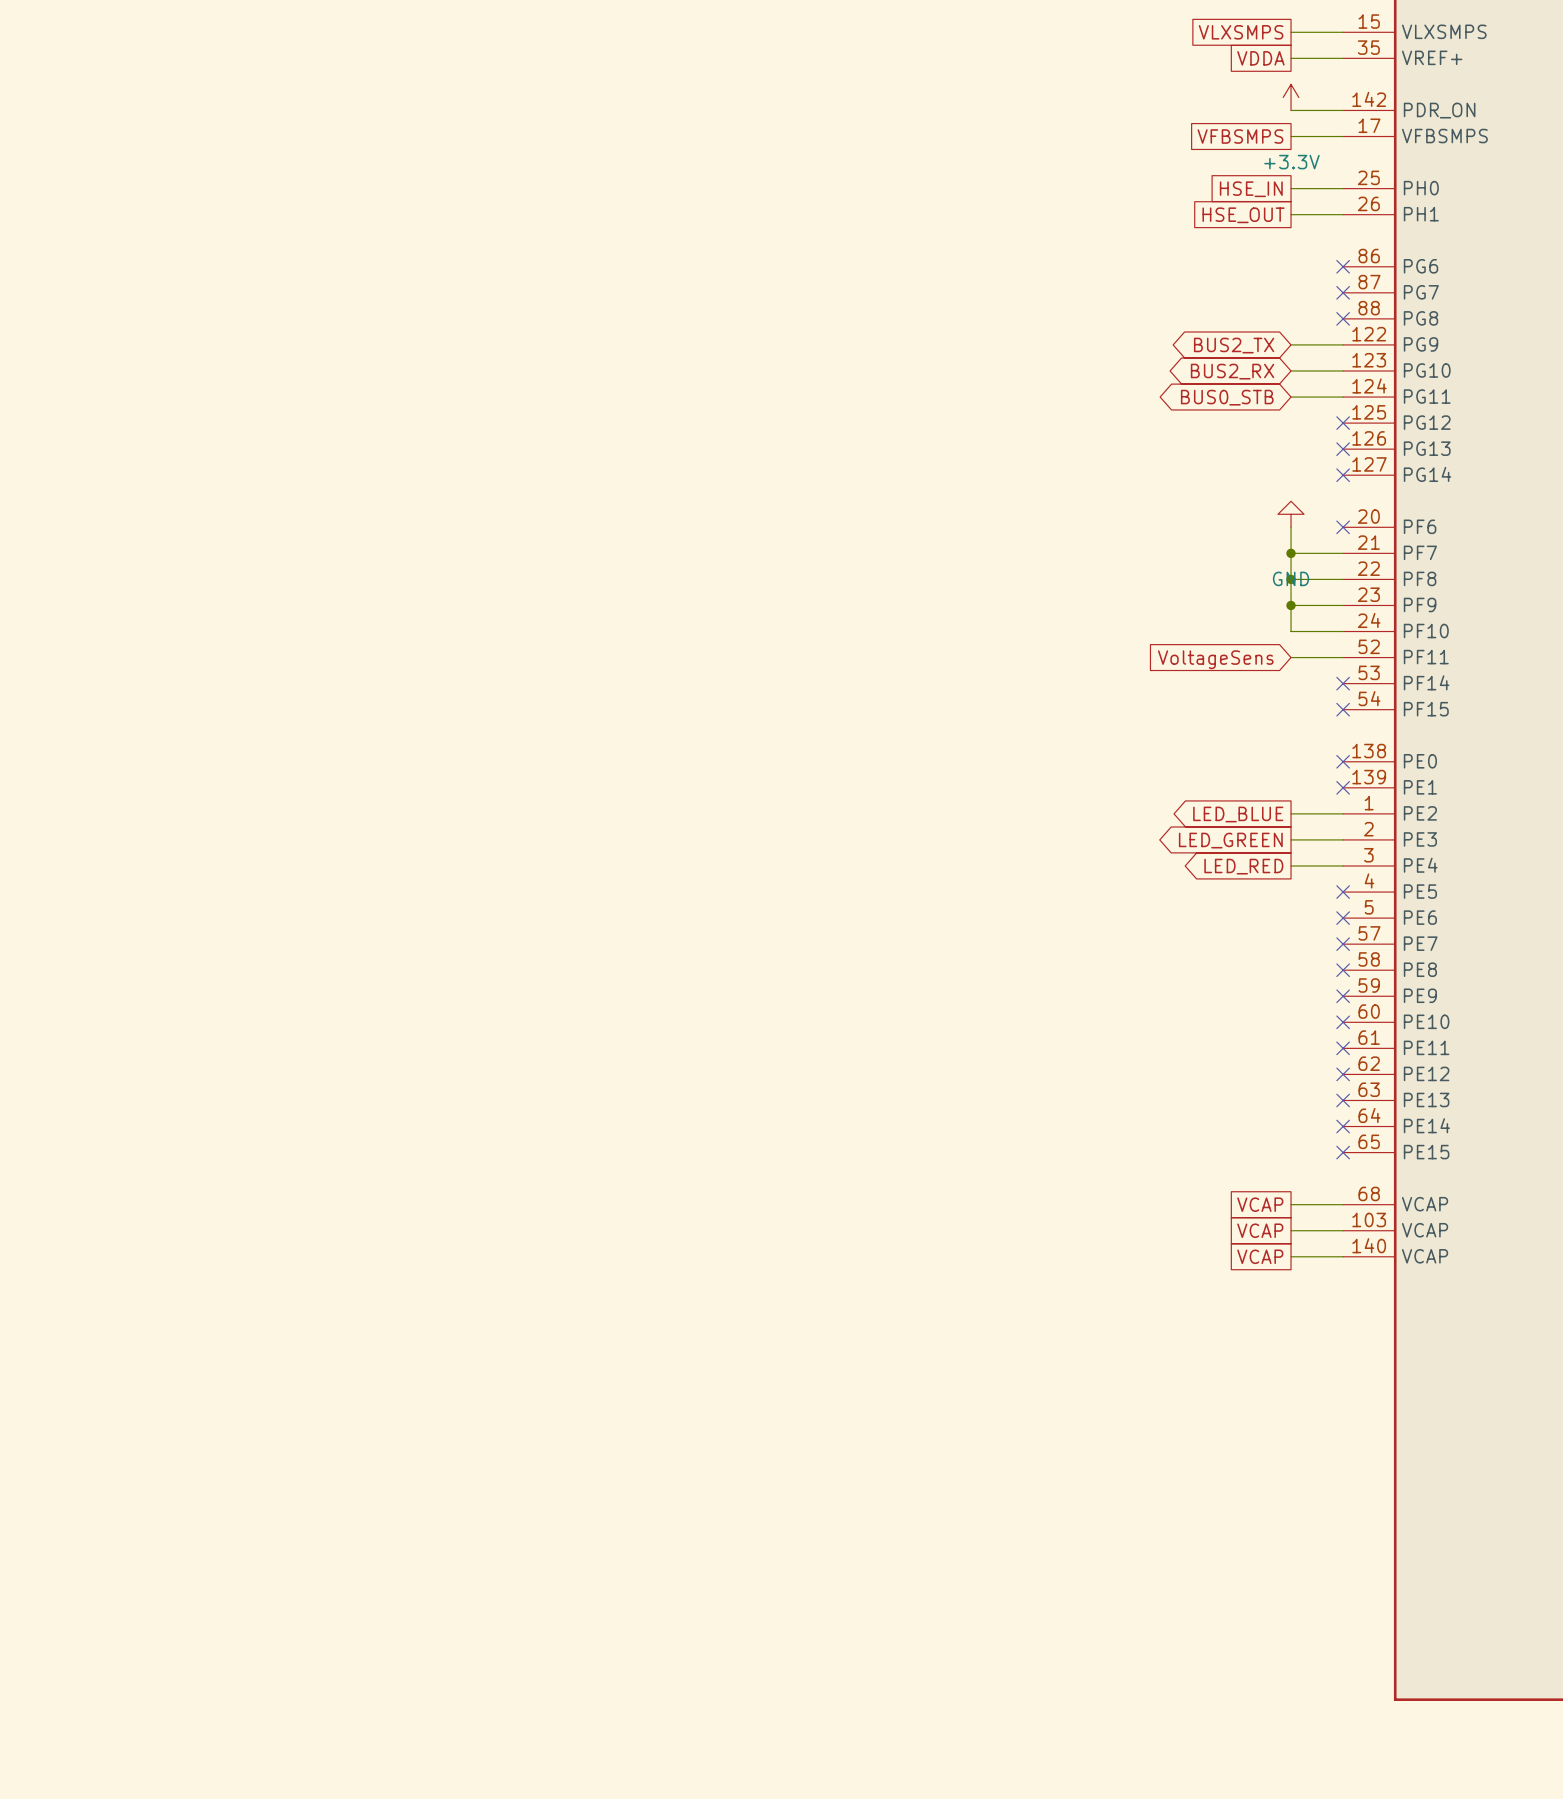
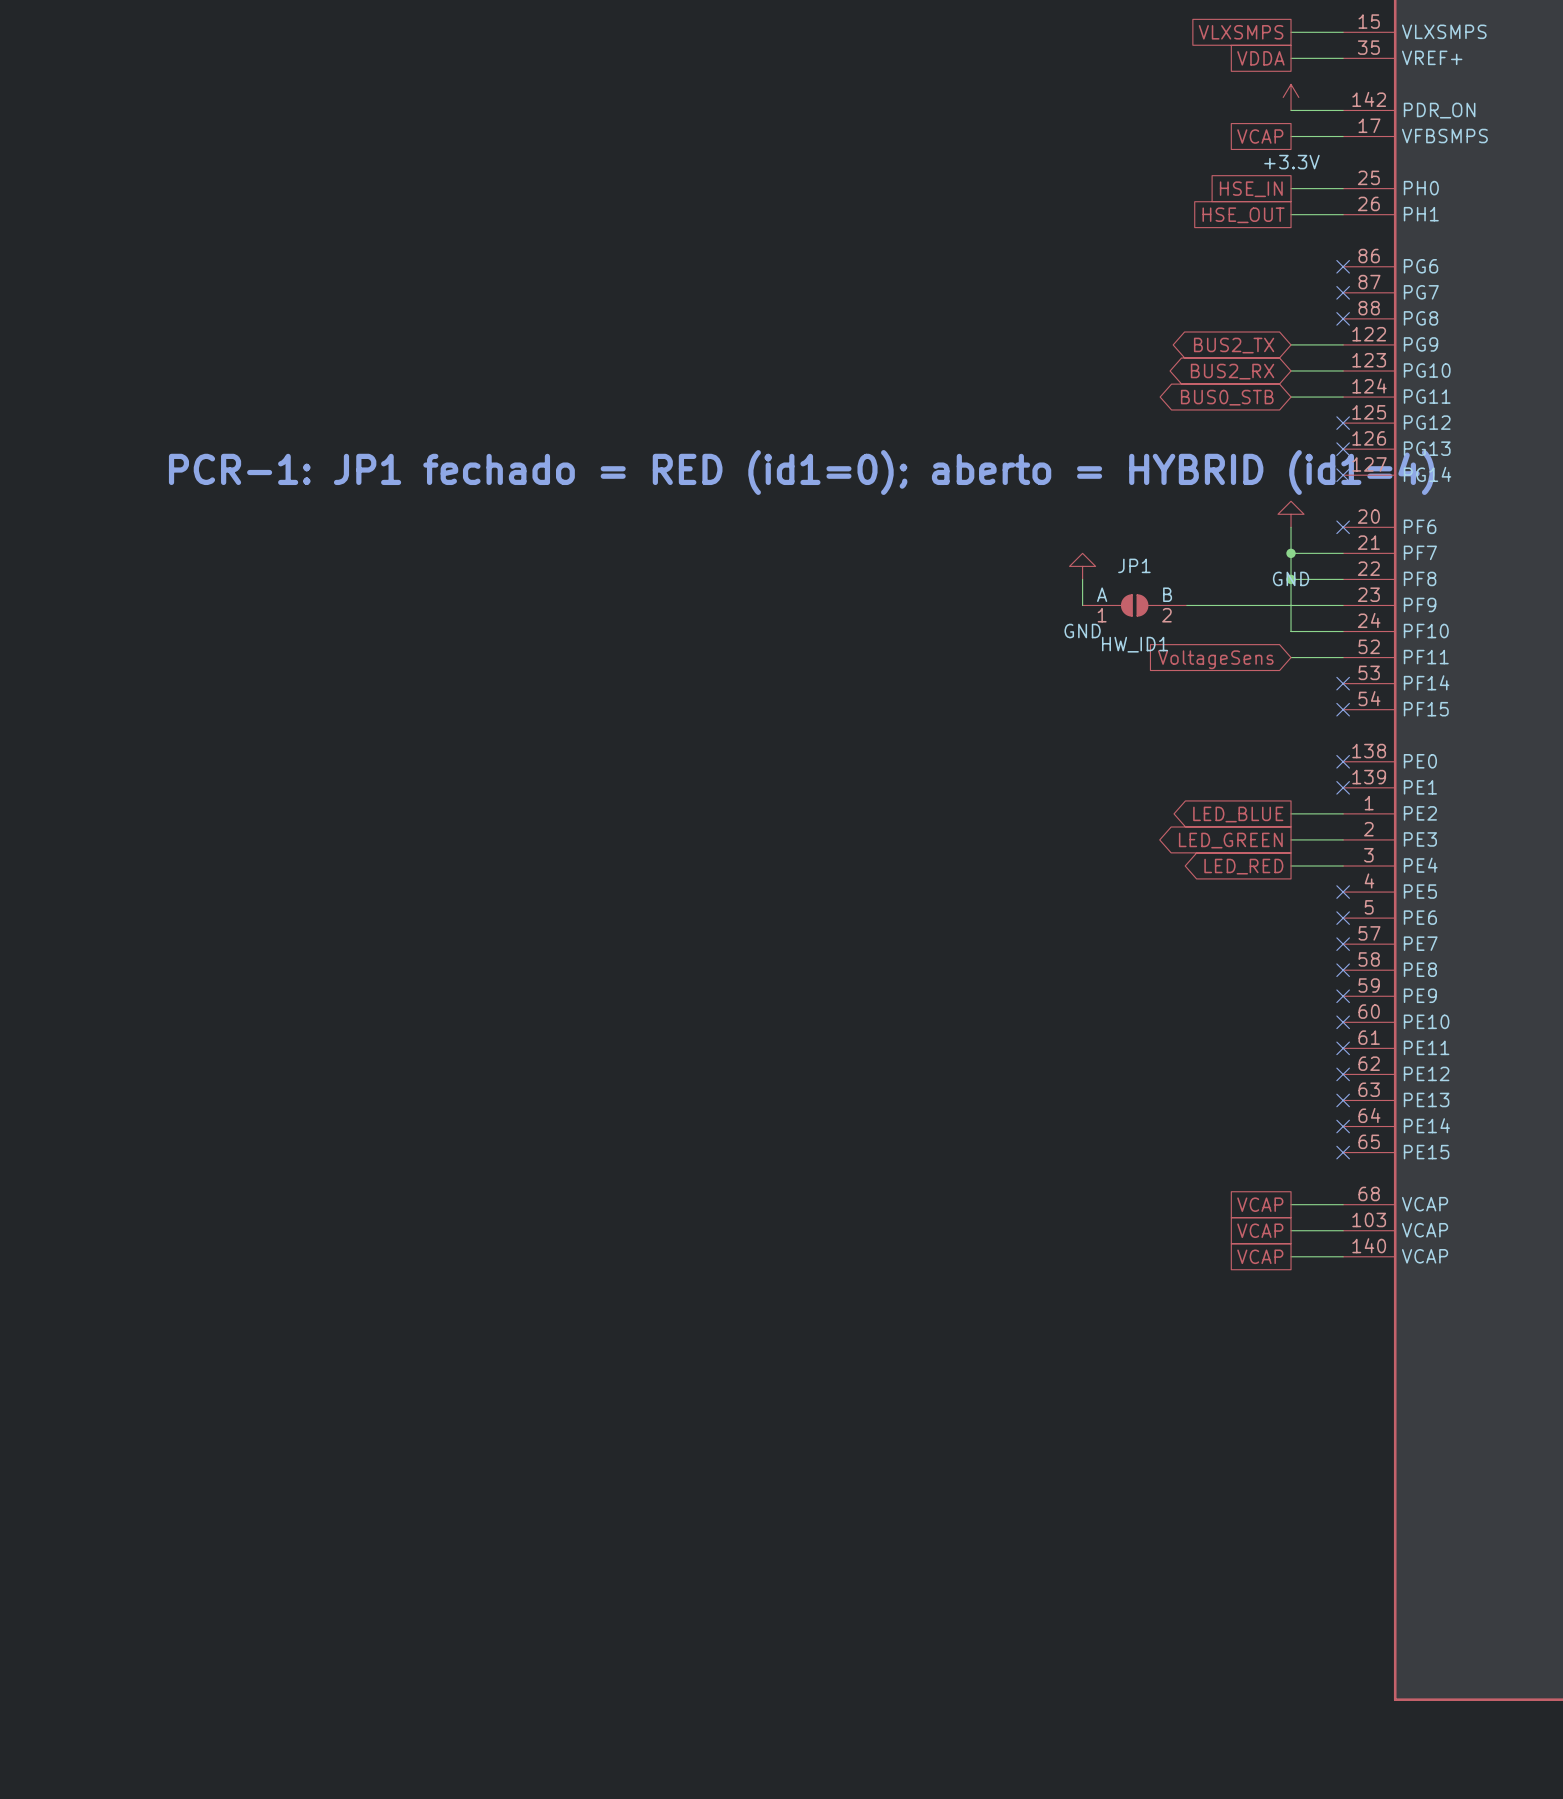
global label: VFBSMPS (1240, 136) -> VCAP (1260, 136)
text: none -> PCR-1: JP1 fechado = RED (id1=0); aberto = HYBRID (id1=4) (801, 472)
power symbol: none -> GND (1082, 566)
wire: none -> (1082, 579) (1082, 605)
JP1: none -> HW_ID1 (1134, 605)
wire: none -> (1186, 605) (1291, 605)
junction: (1291, 605) -> none

